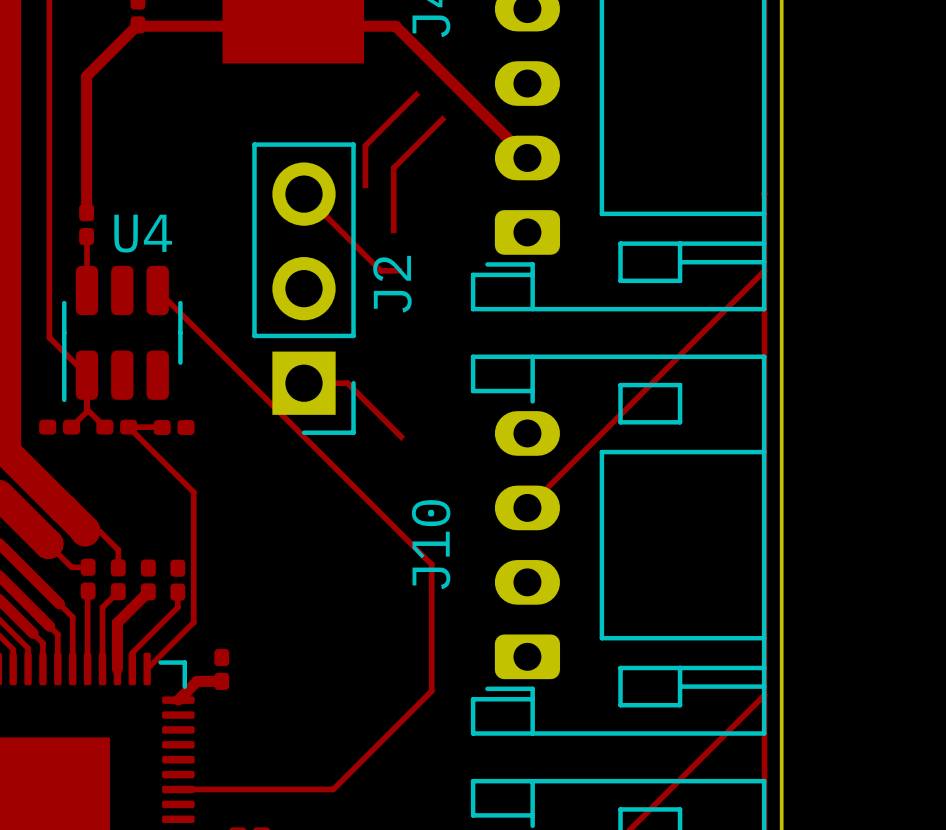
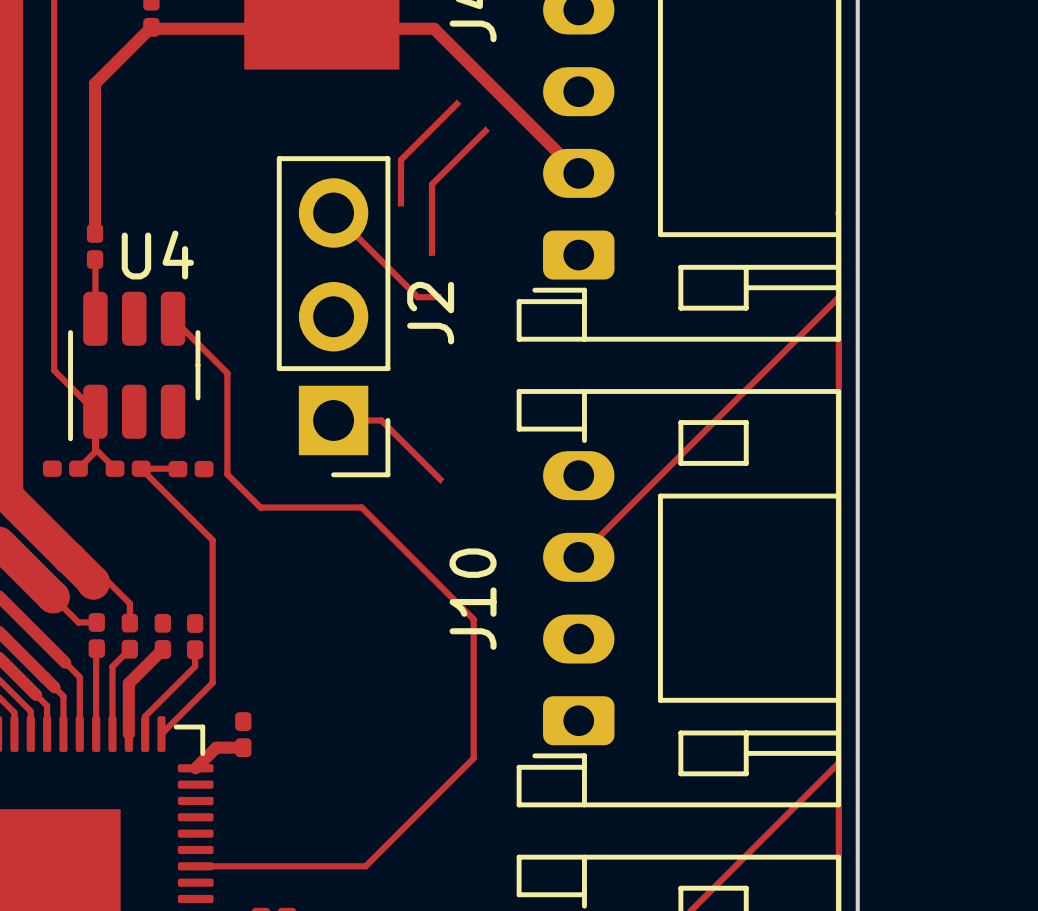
track: (207, 340) (329, 462) -> (227, 373) (227, 474) (260, 507) (361, 507)

